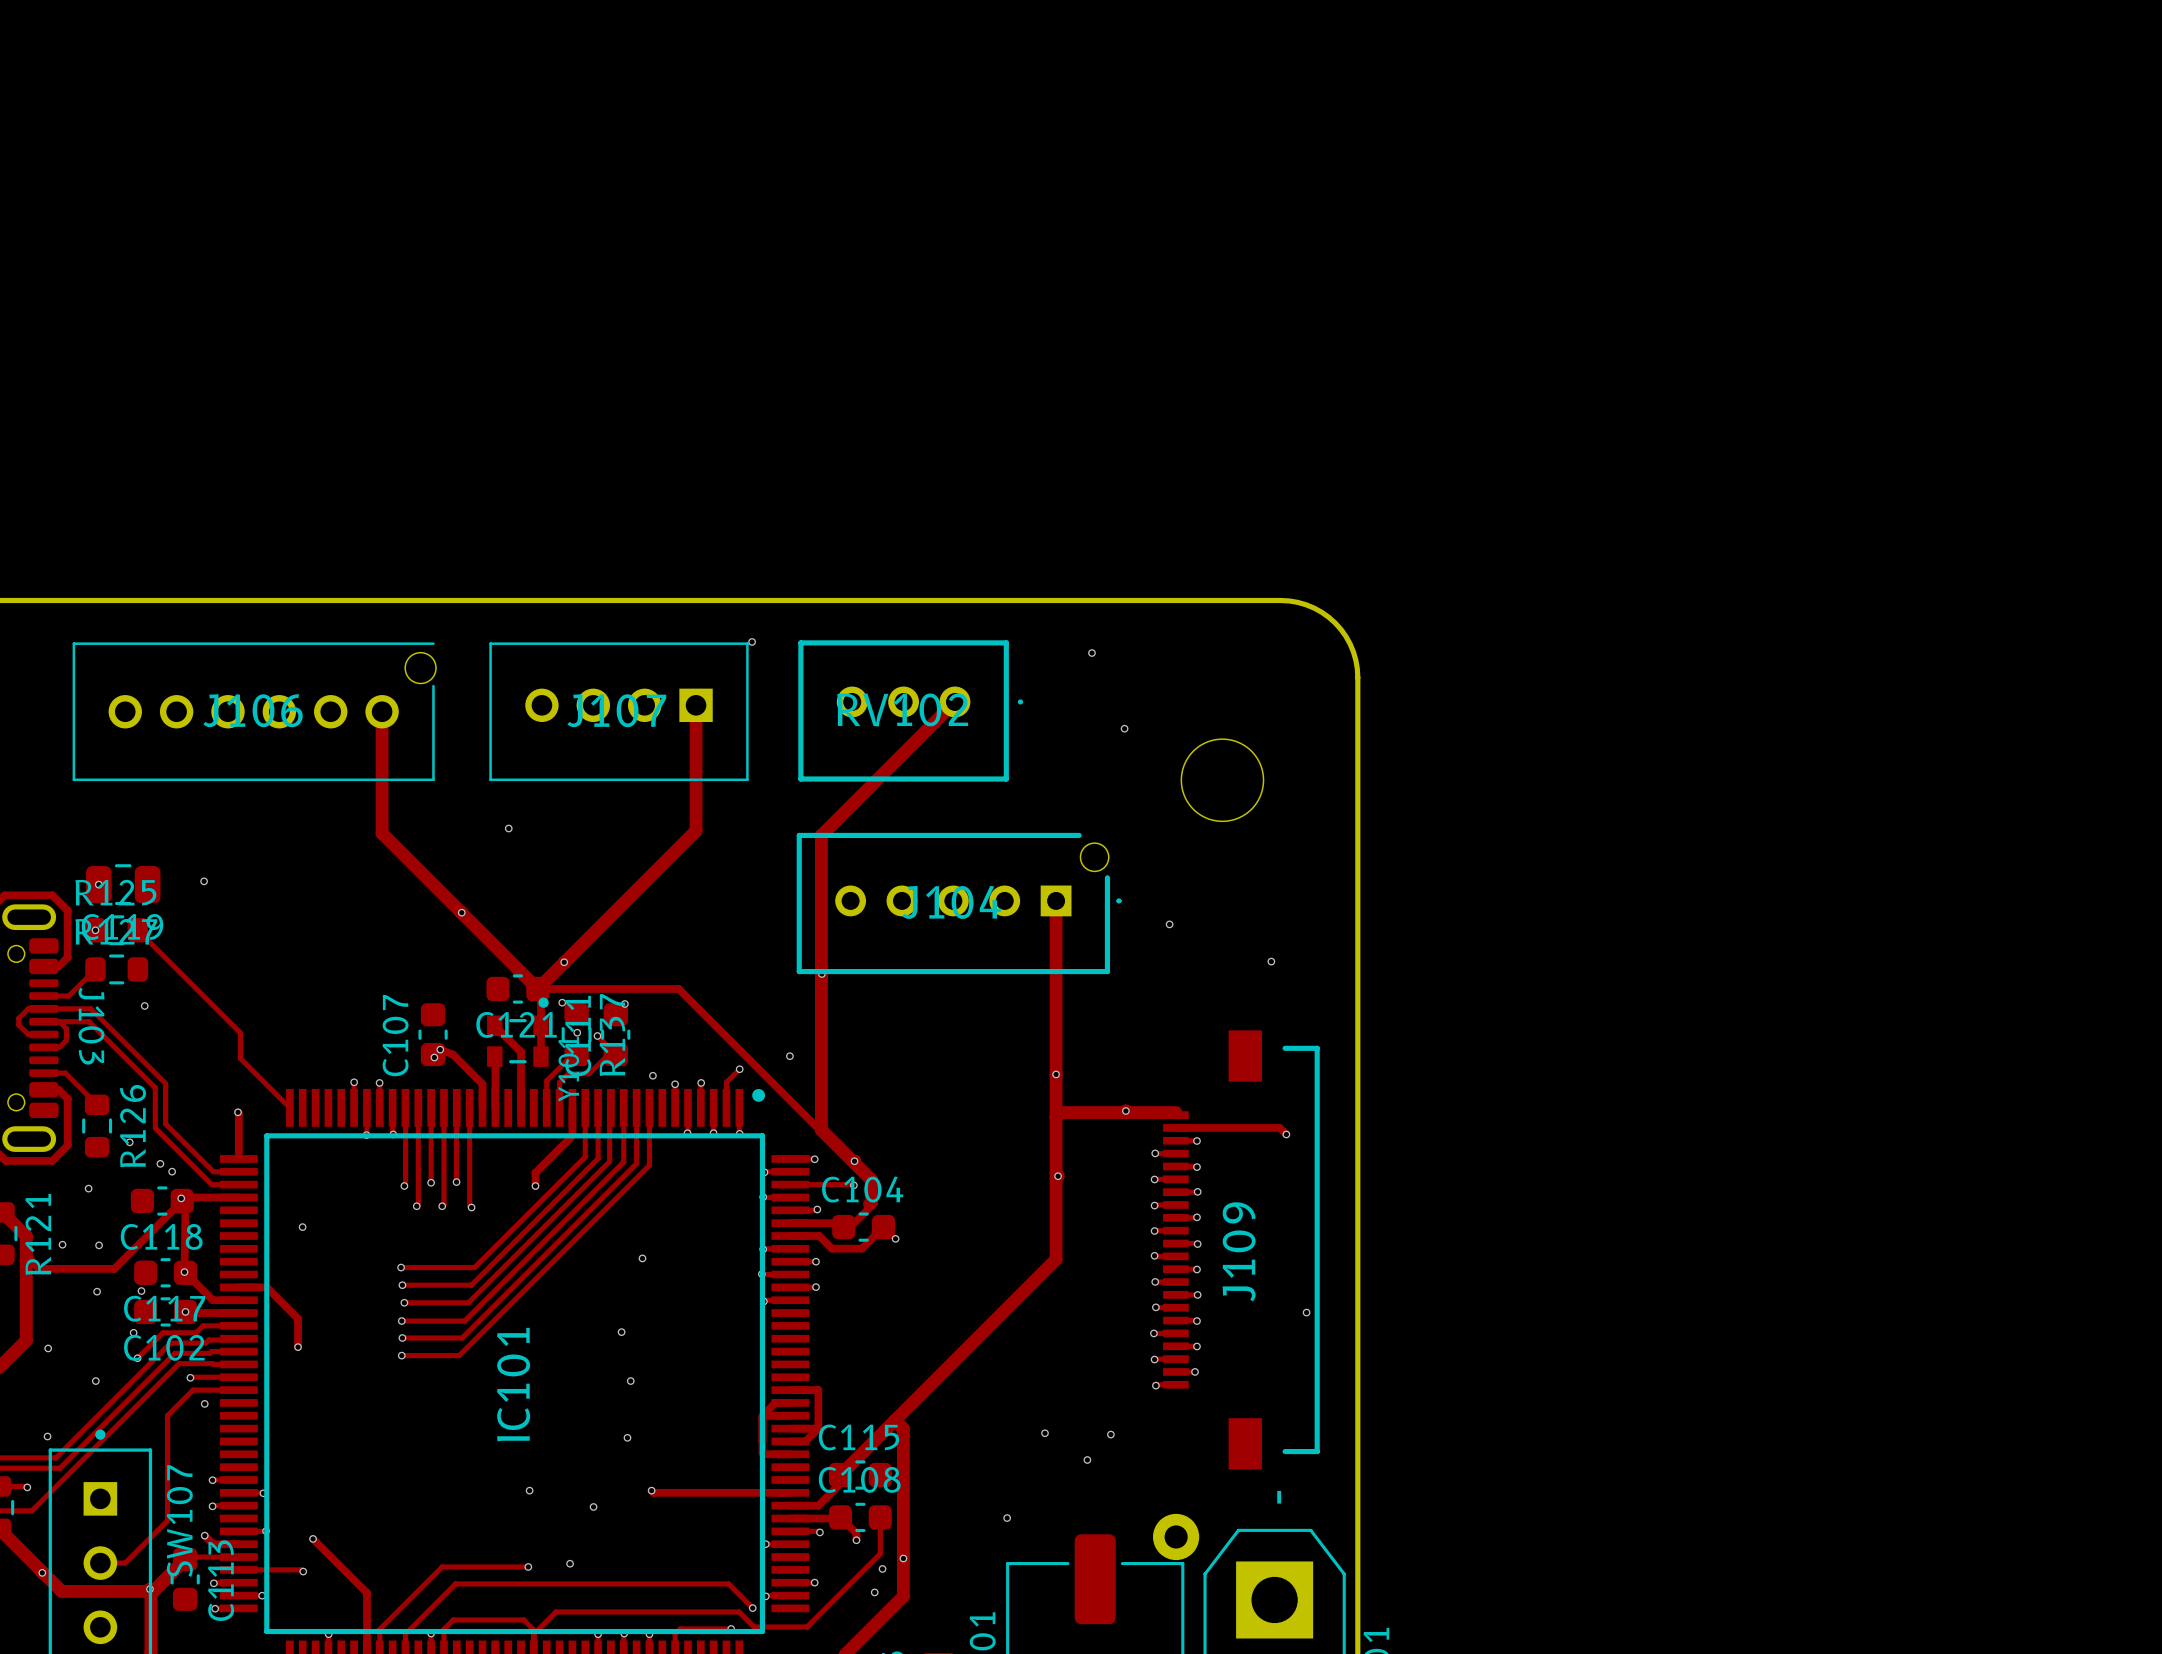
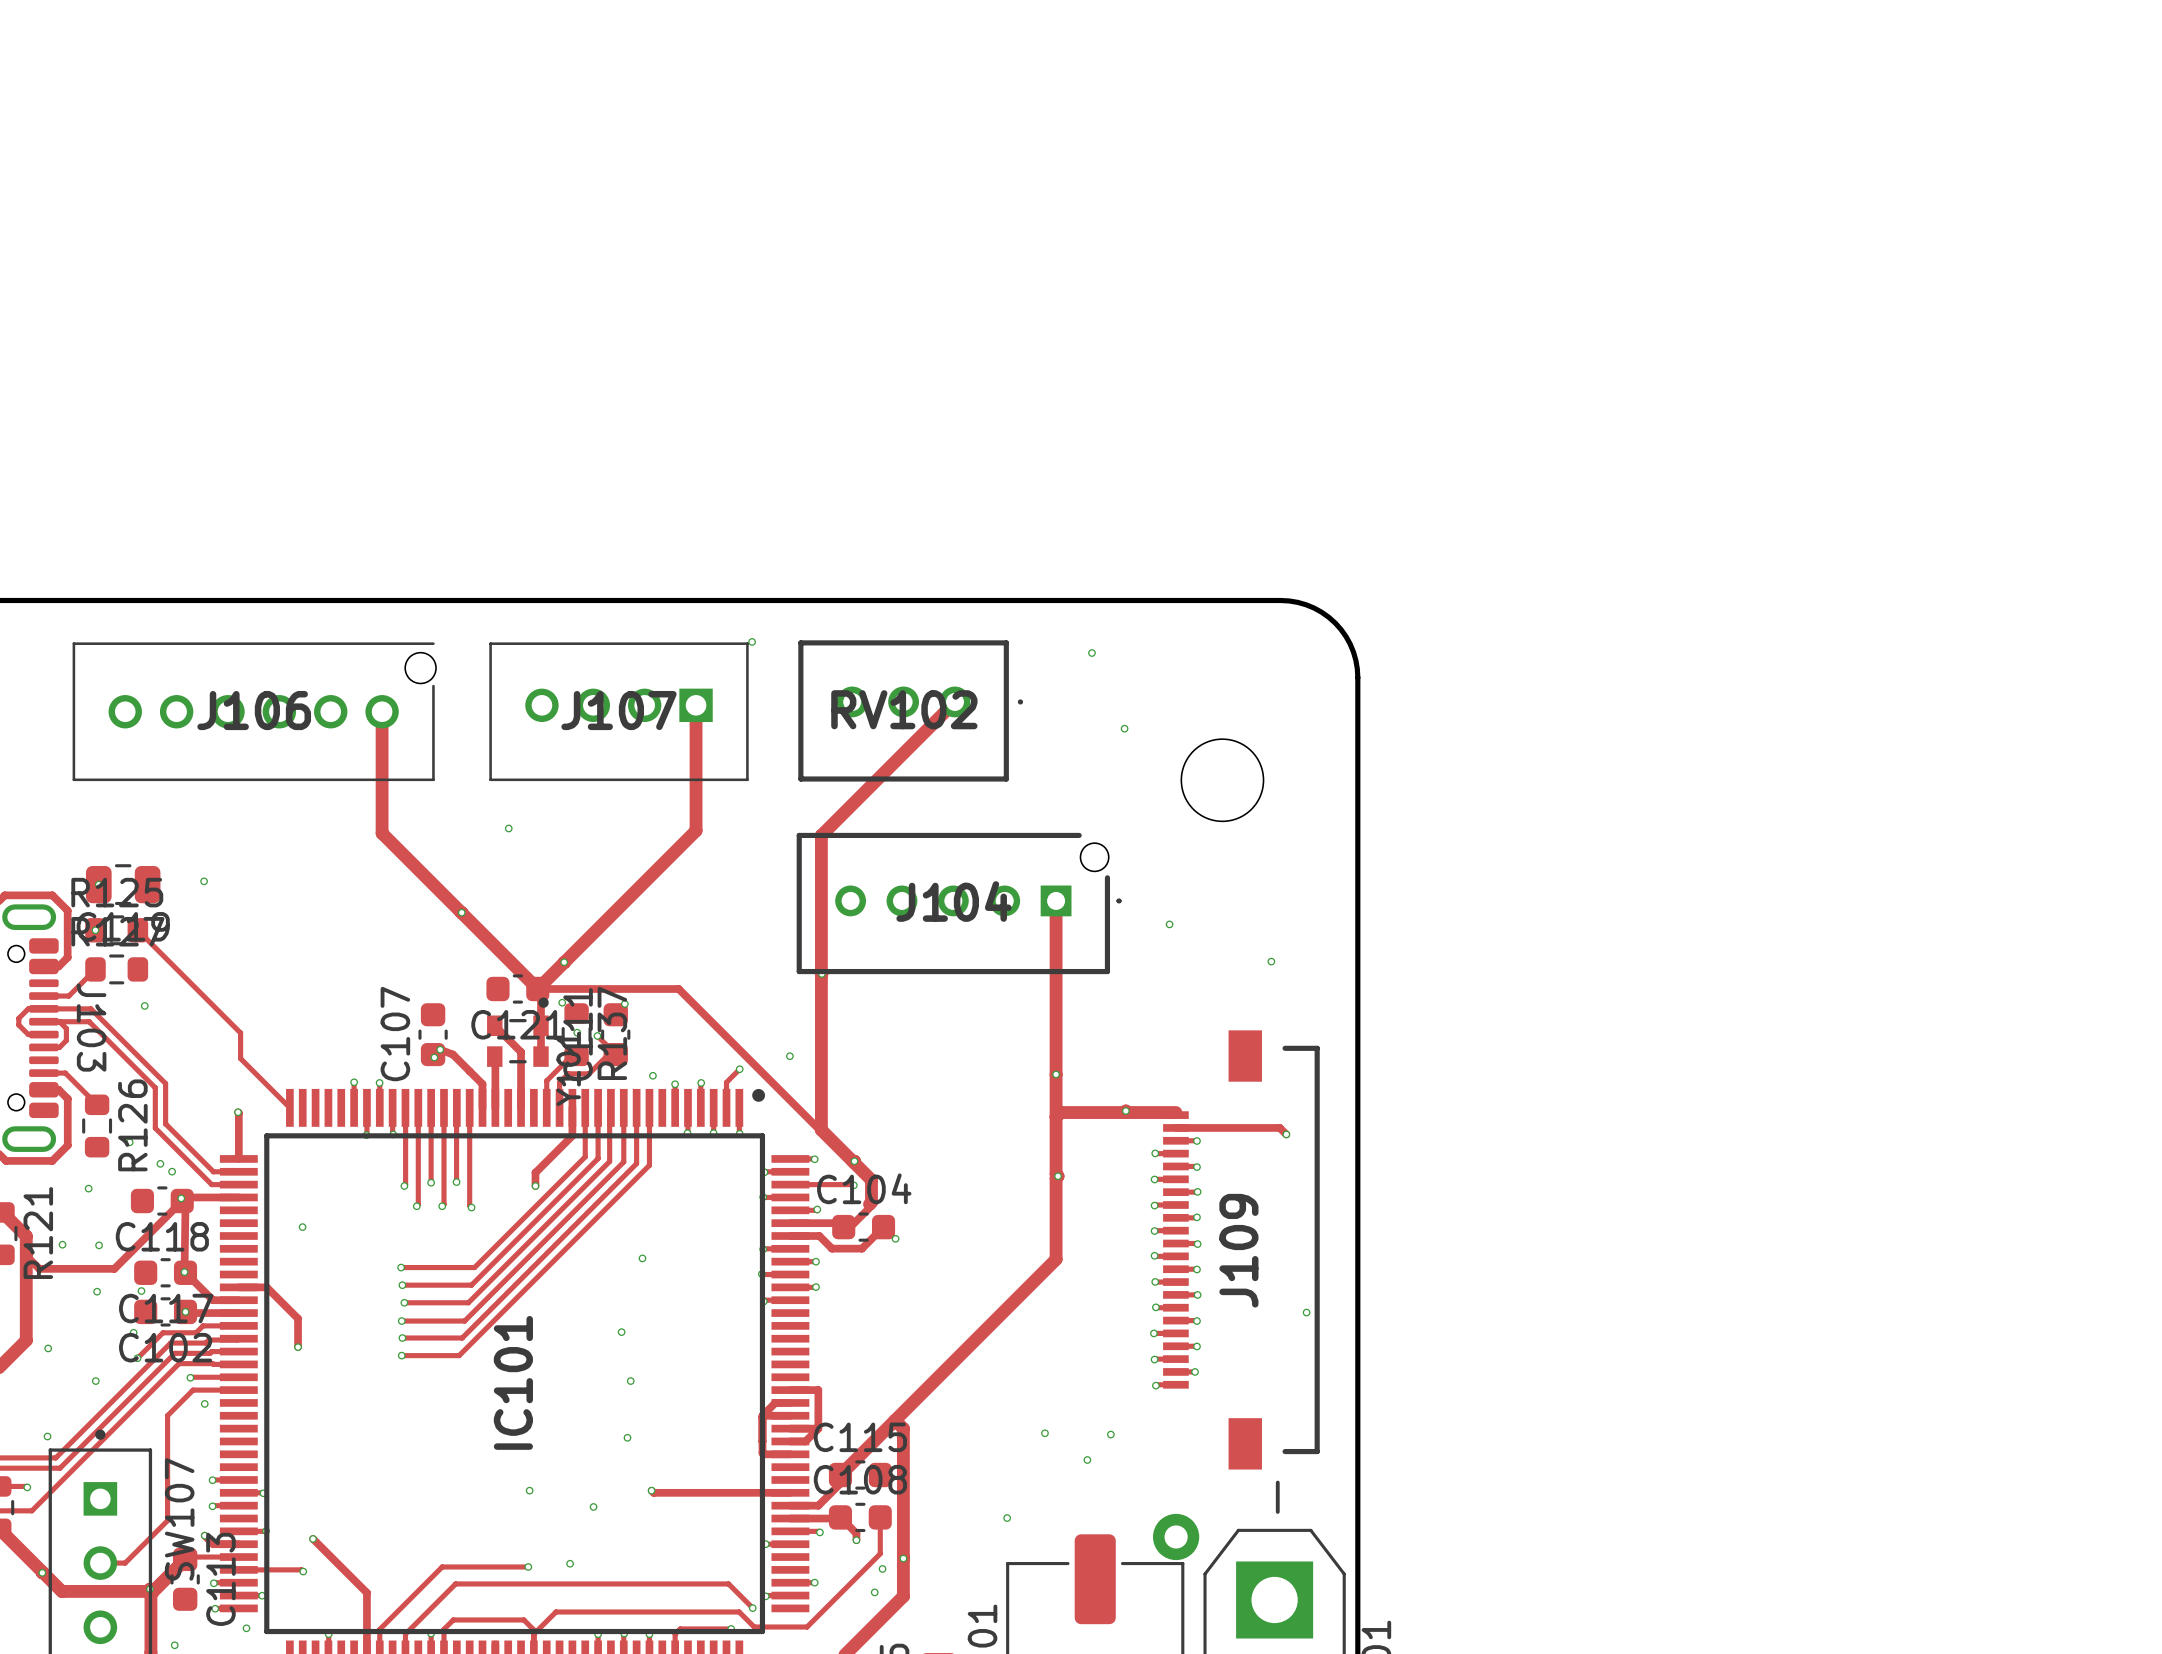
via: none -> (246, 1628)
via: none -> (174, 1645)

